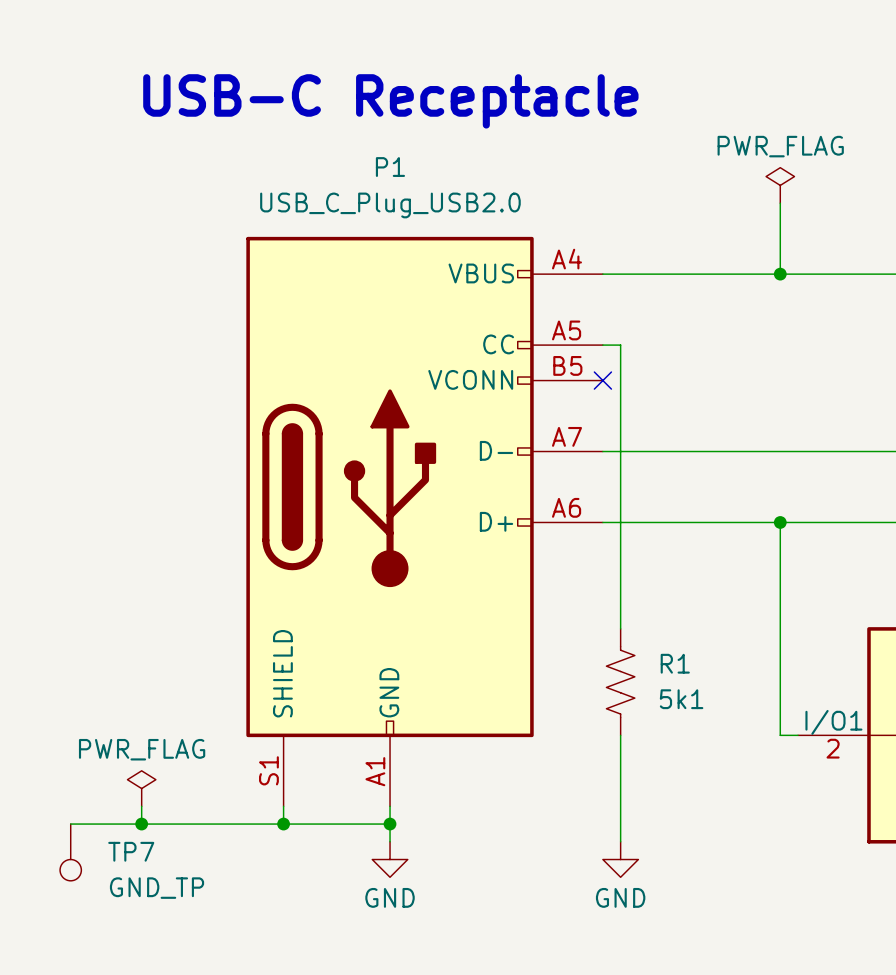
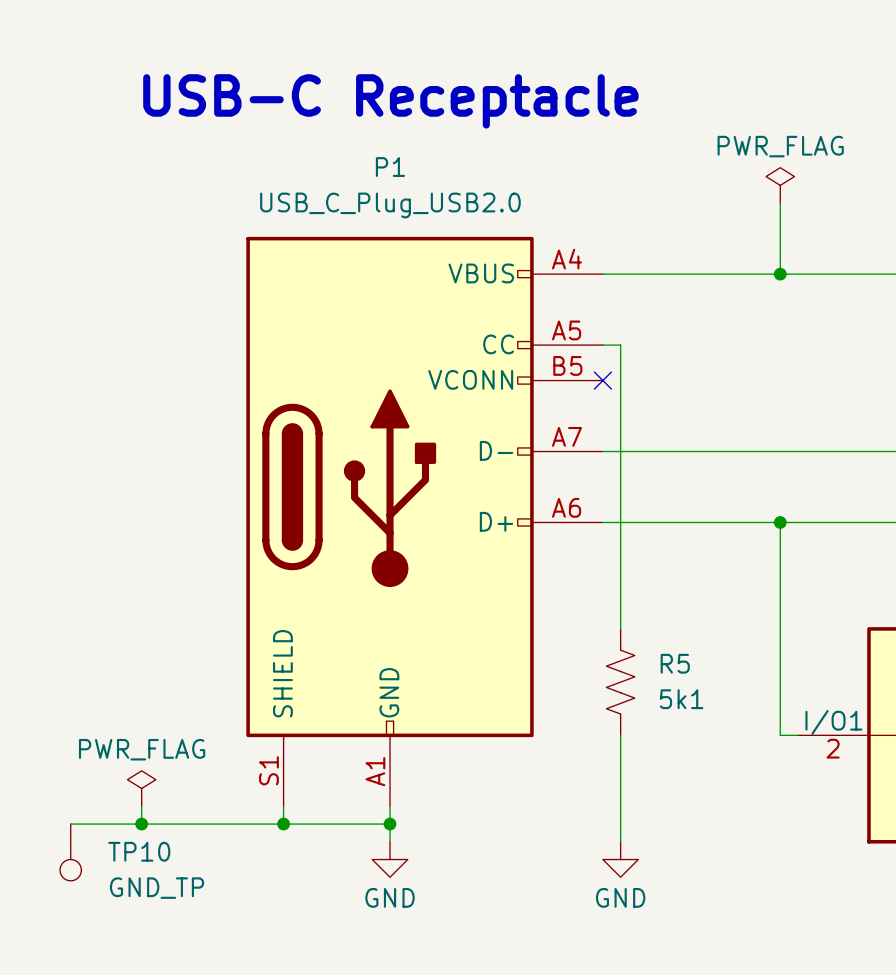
R1 name: R1 (675, 663) -> R5 (675, 663)
TP7 name: TP7 (131, 851) -> TP10 (139, 851)

